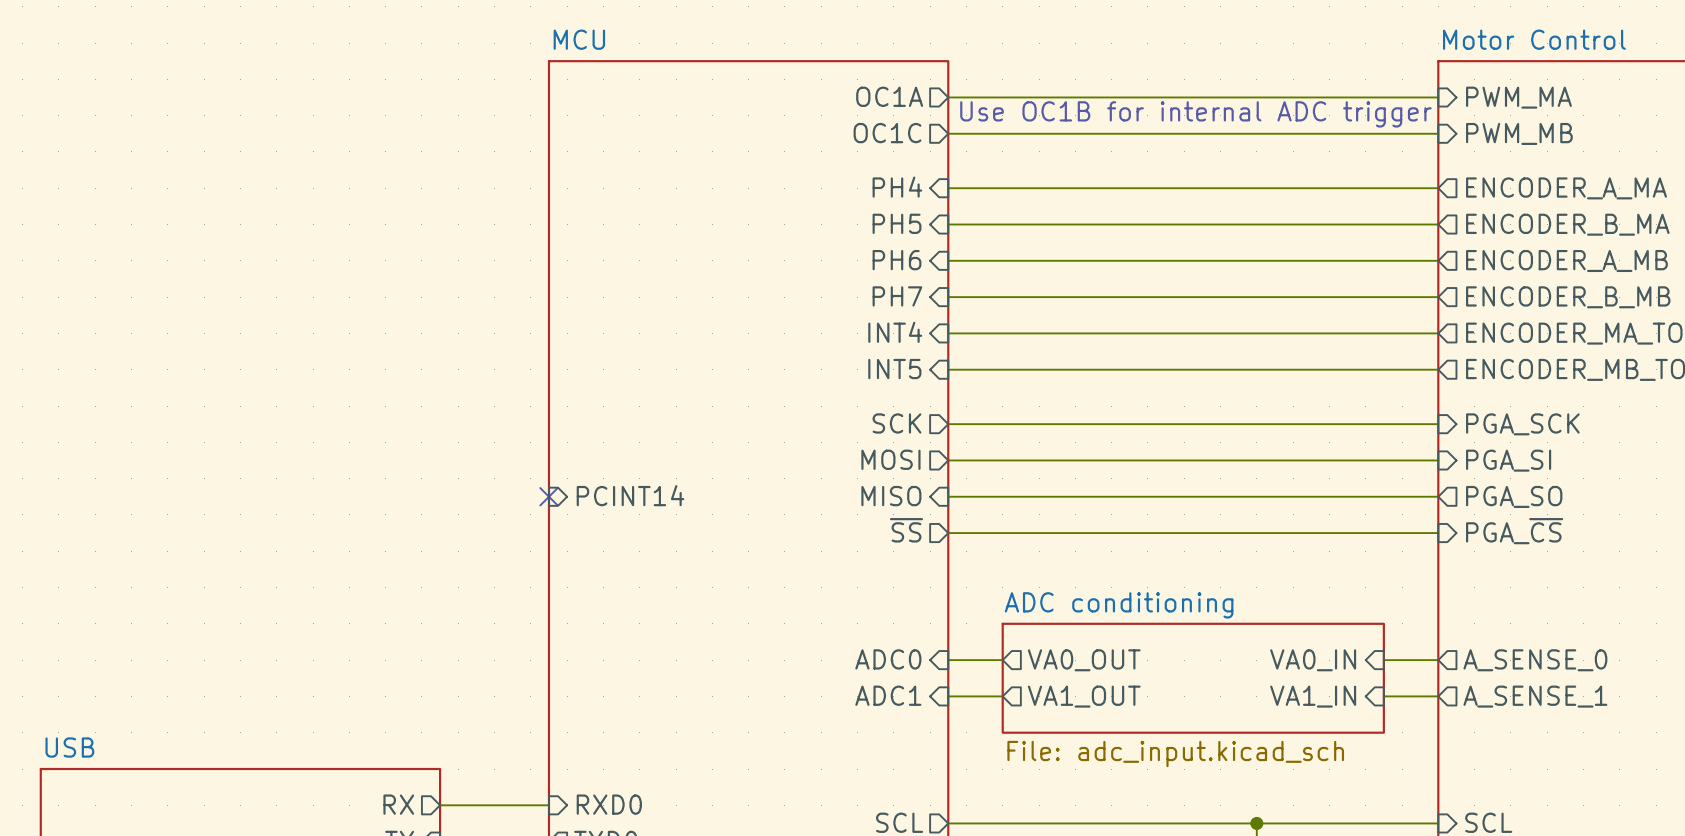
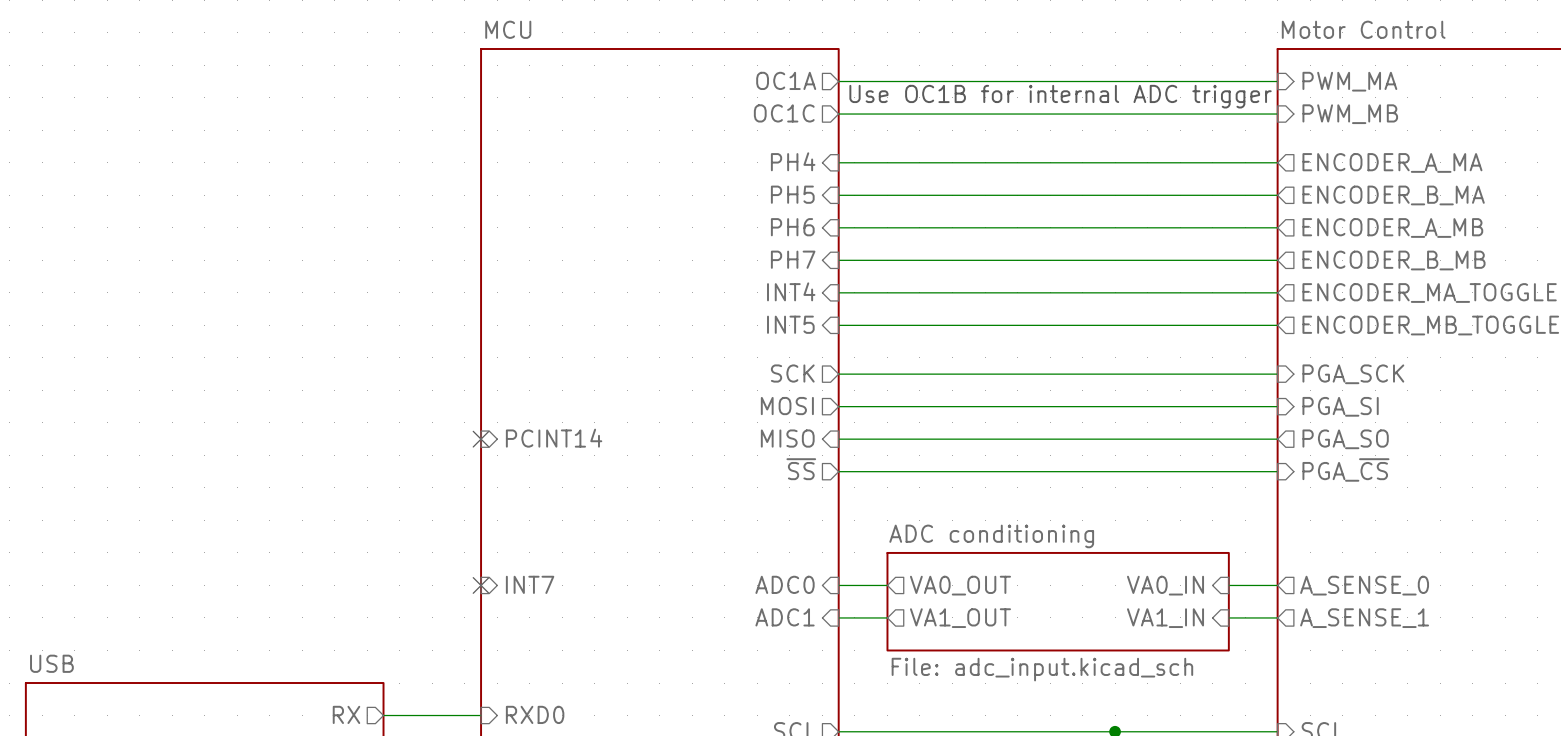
sheet pin: none -> INT7 (530, 584)
no-connect mark: none -> (481, 585)

